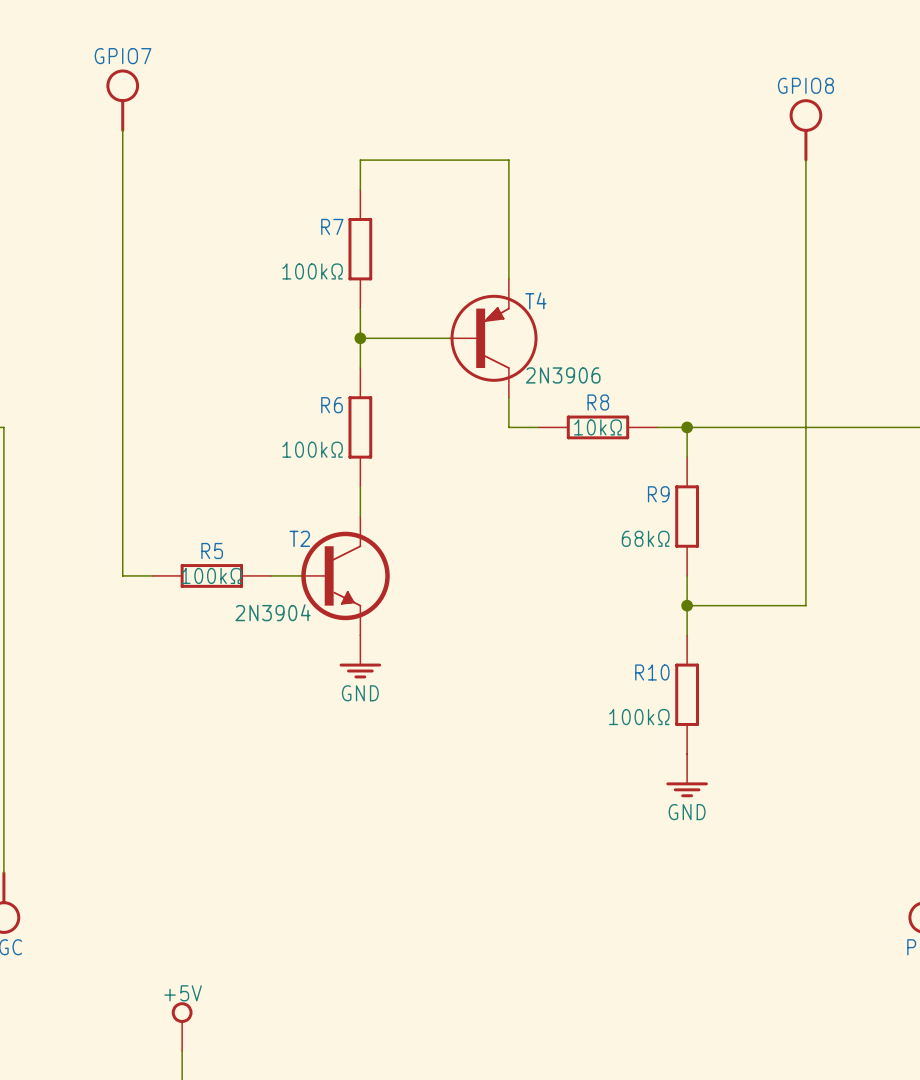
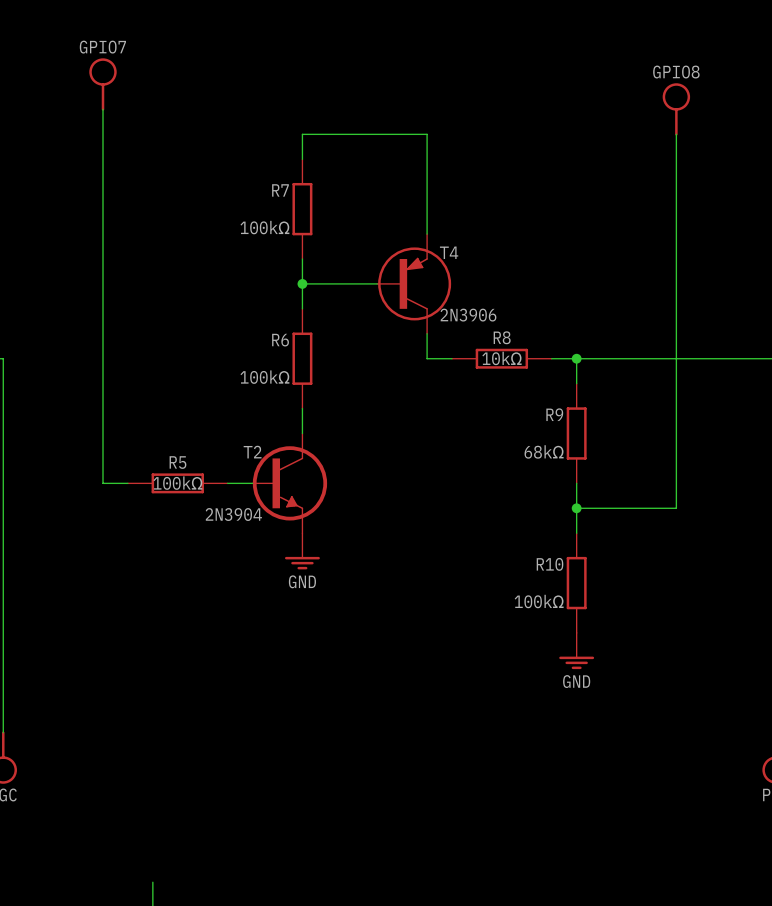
power symbol: +5V (182, 1026) -> none

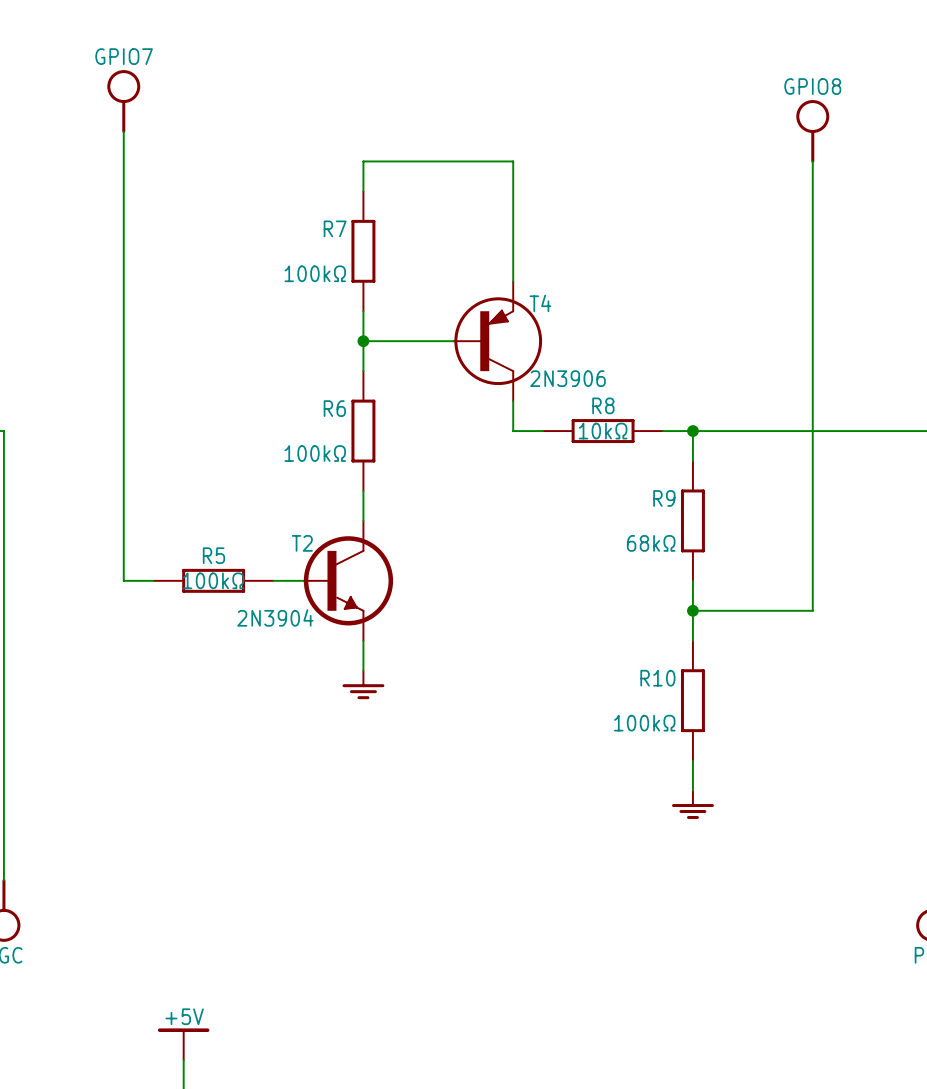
power symbol: GND (302, 551) -> none
power symbol: none -> (363, 684)
power symbol: GND (576, 651) -> none
power symbol: none -> (692, 804)
power symbol: none -> +5V (183, 1044)

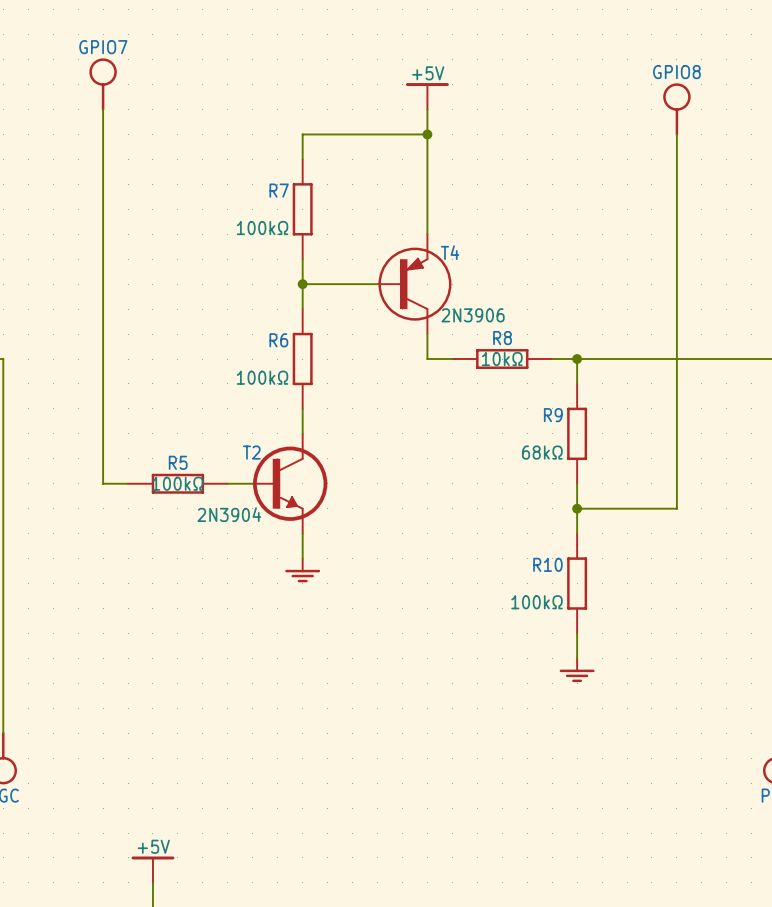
power symbol: none -> +5V (427, 96)
wire: none -> (427, 109) (427, 134)
junction: none -> (427, 134)

